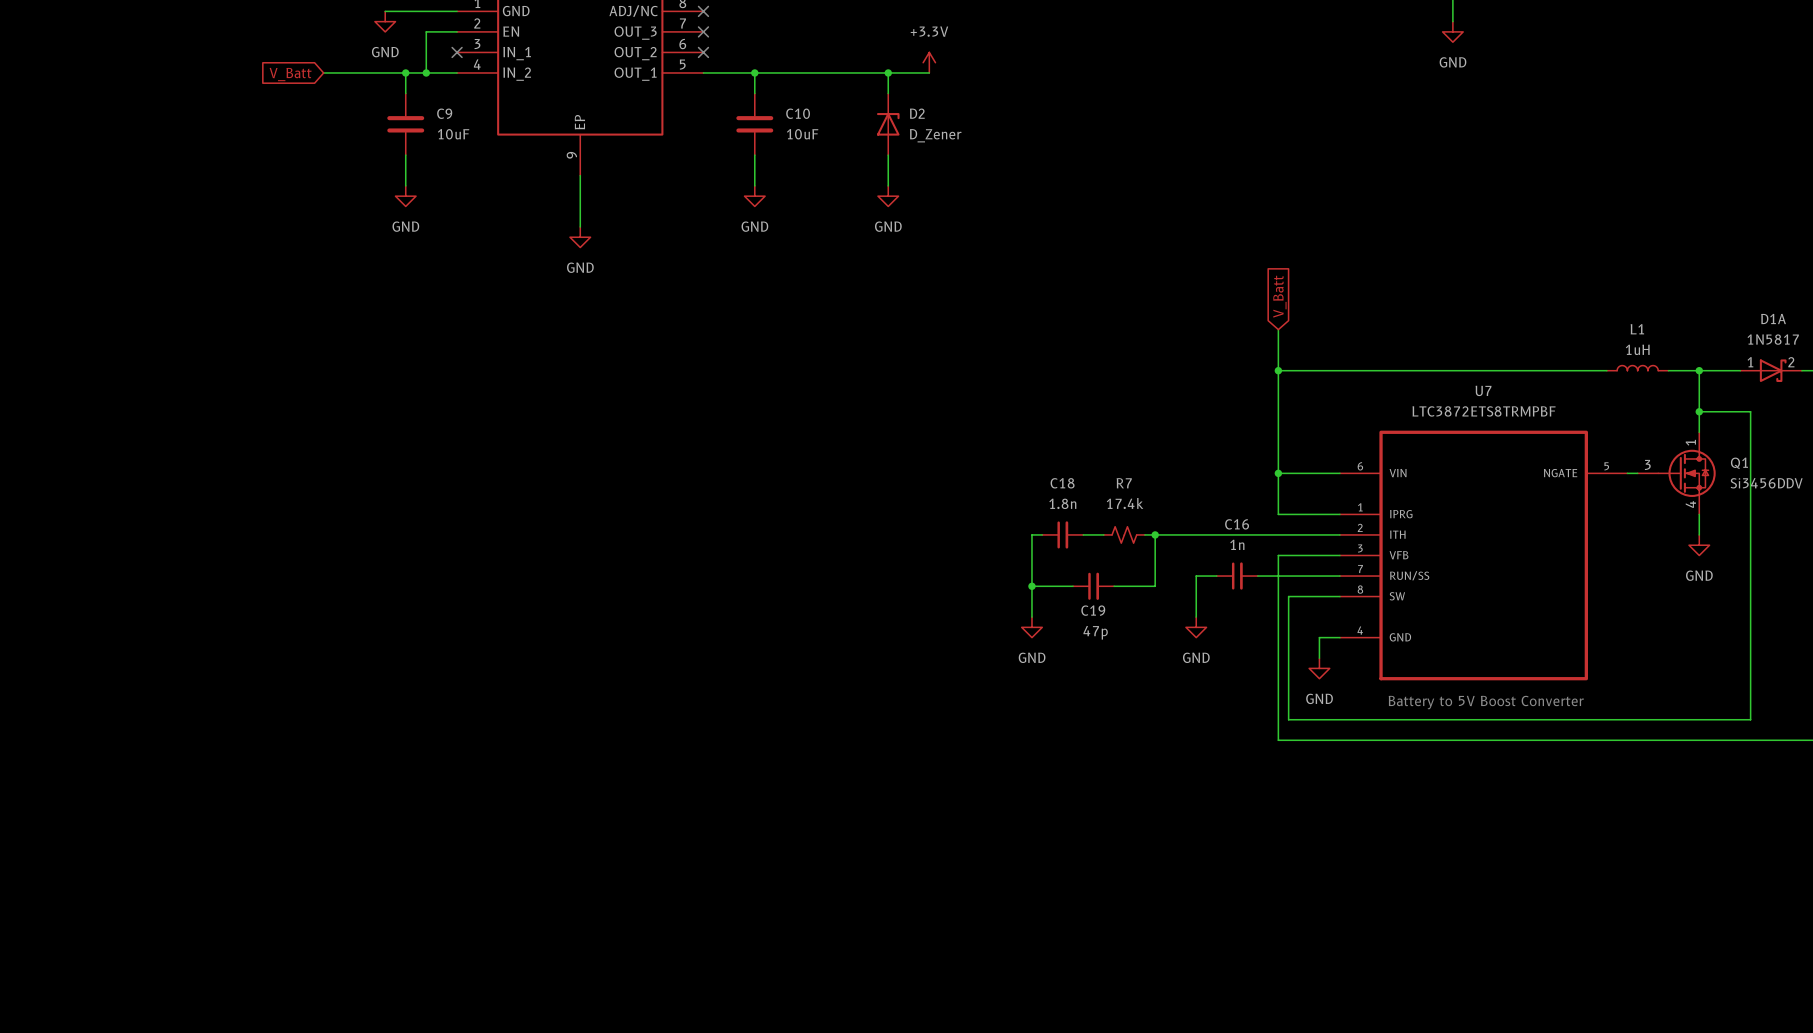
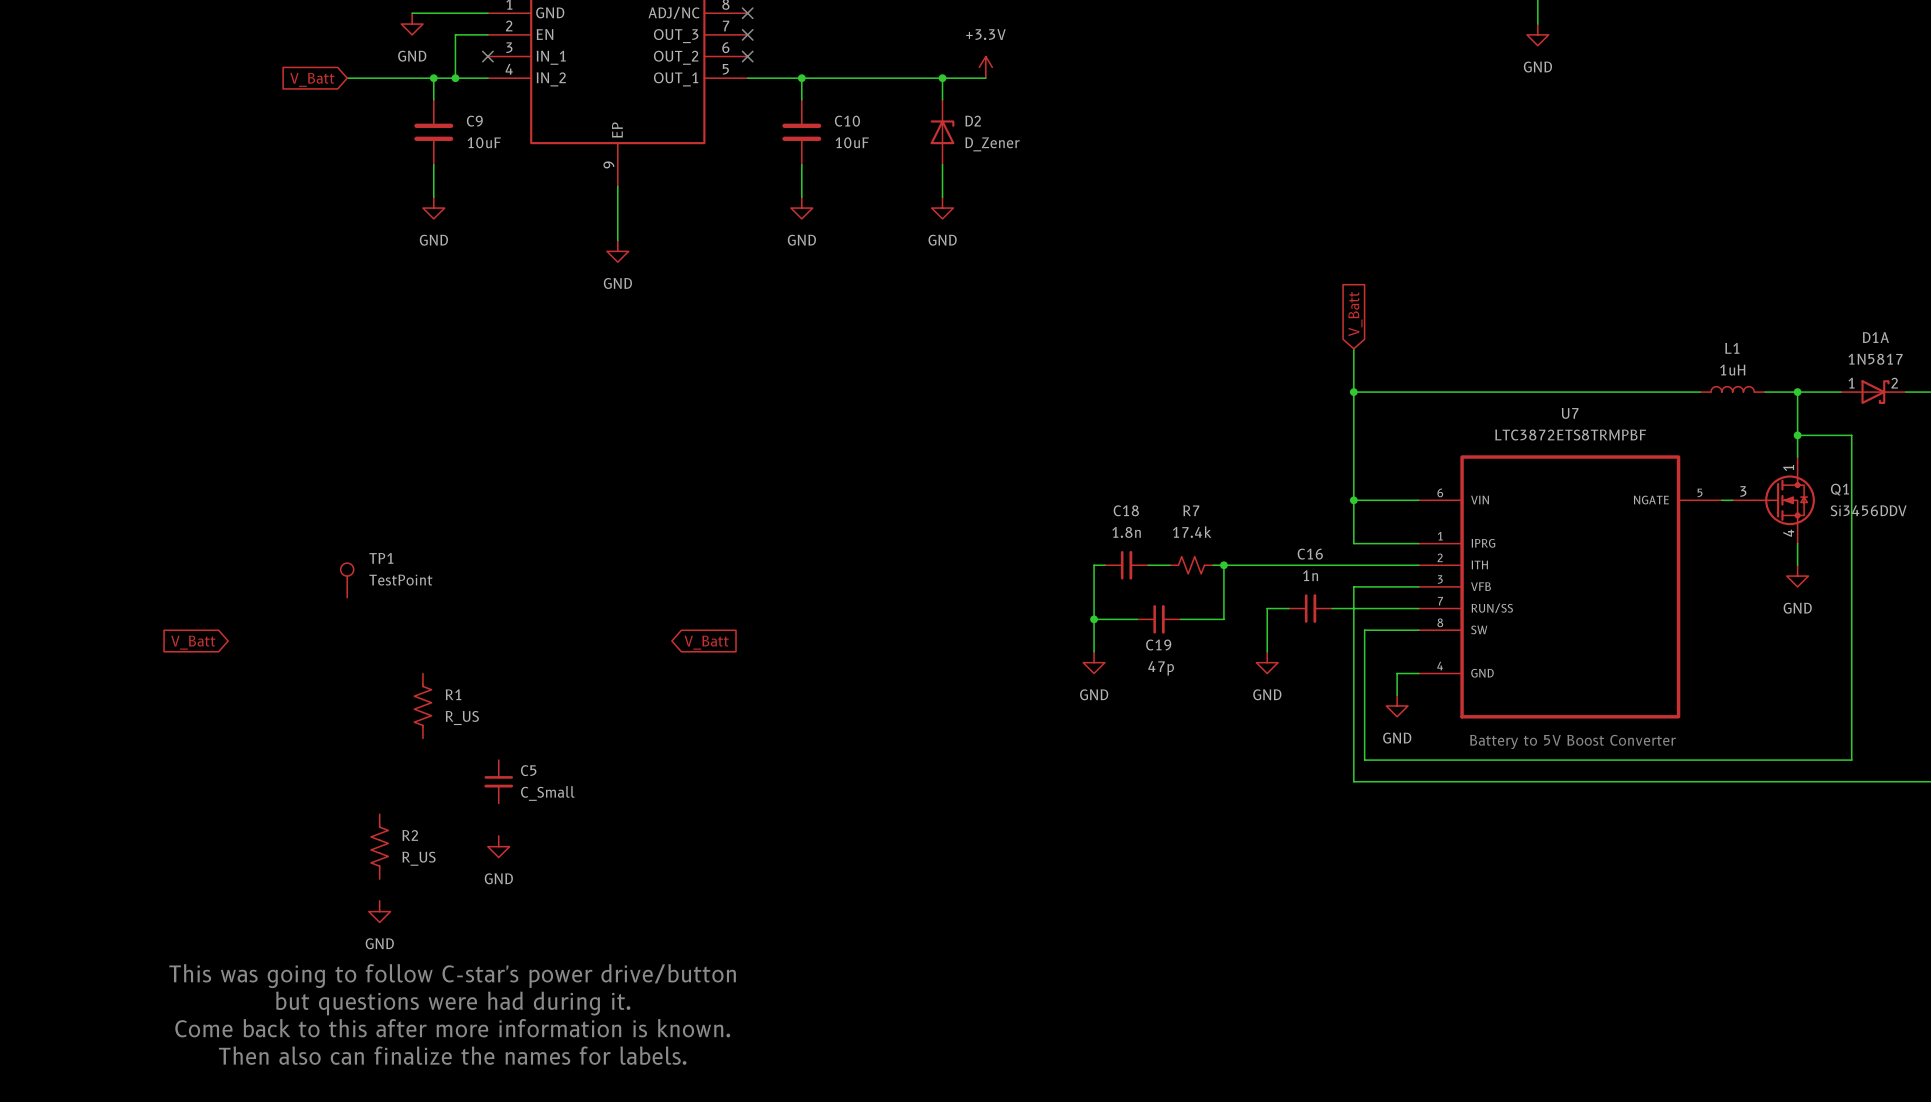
TP1: none -> TestPoint (347, 580)
global label: none -> V_Batt (193, 642)
global label: none -> V_Batt (706, 642)
R1: none -> R_US (422, 705)
C5: none -> C_Small (498, 781)
R2: none -> R_US (379, 846)
power symbol: none -> GND (498, 846)
power symbol: none -> GND (379, 911)
text: none -> This was going to follow C-star's power drive/button (452, 976)
text: none -> but questions were had during it. (453, 1003)
text: none -> Come back to this after more information is known. (452, 1028)
text: none -> Then also can finalize the names for labels. (452, 1055)

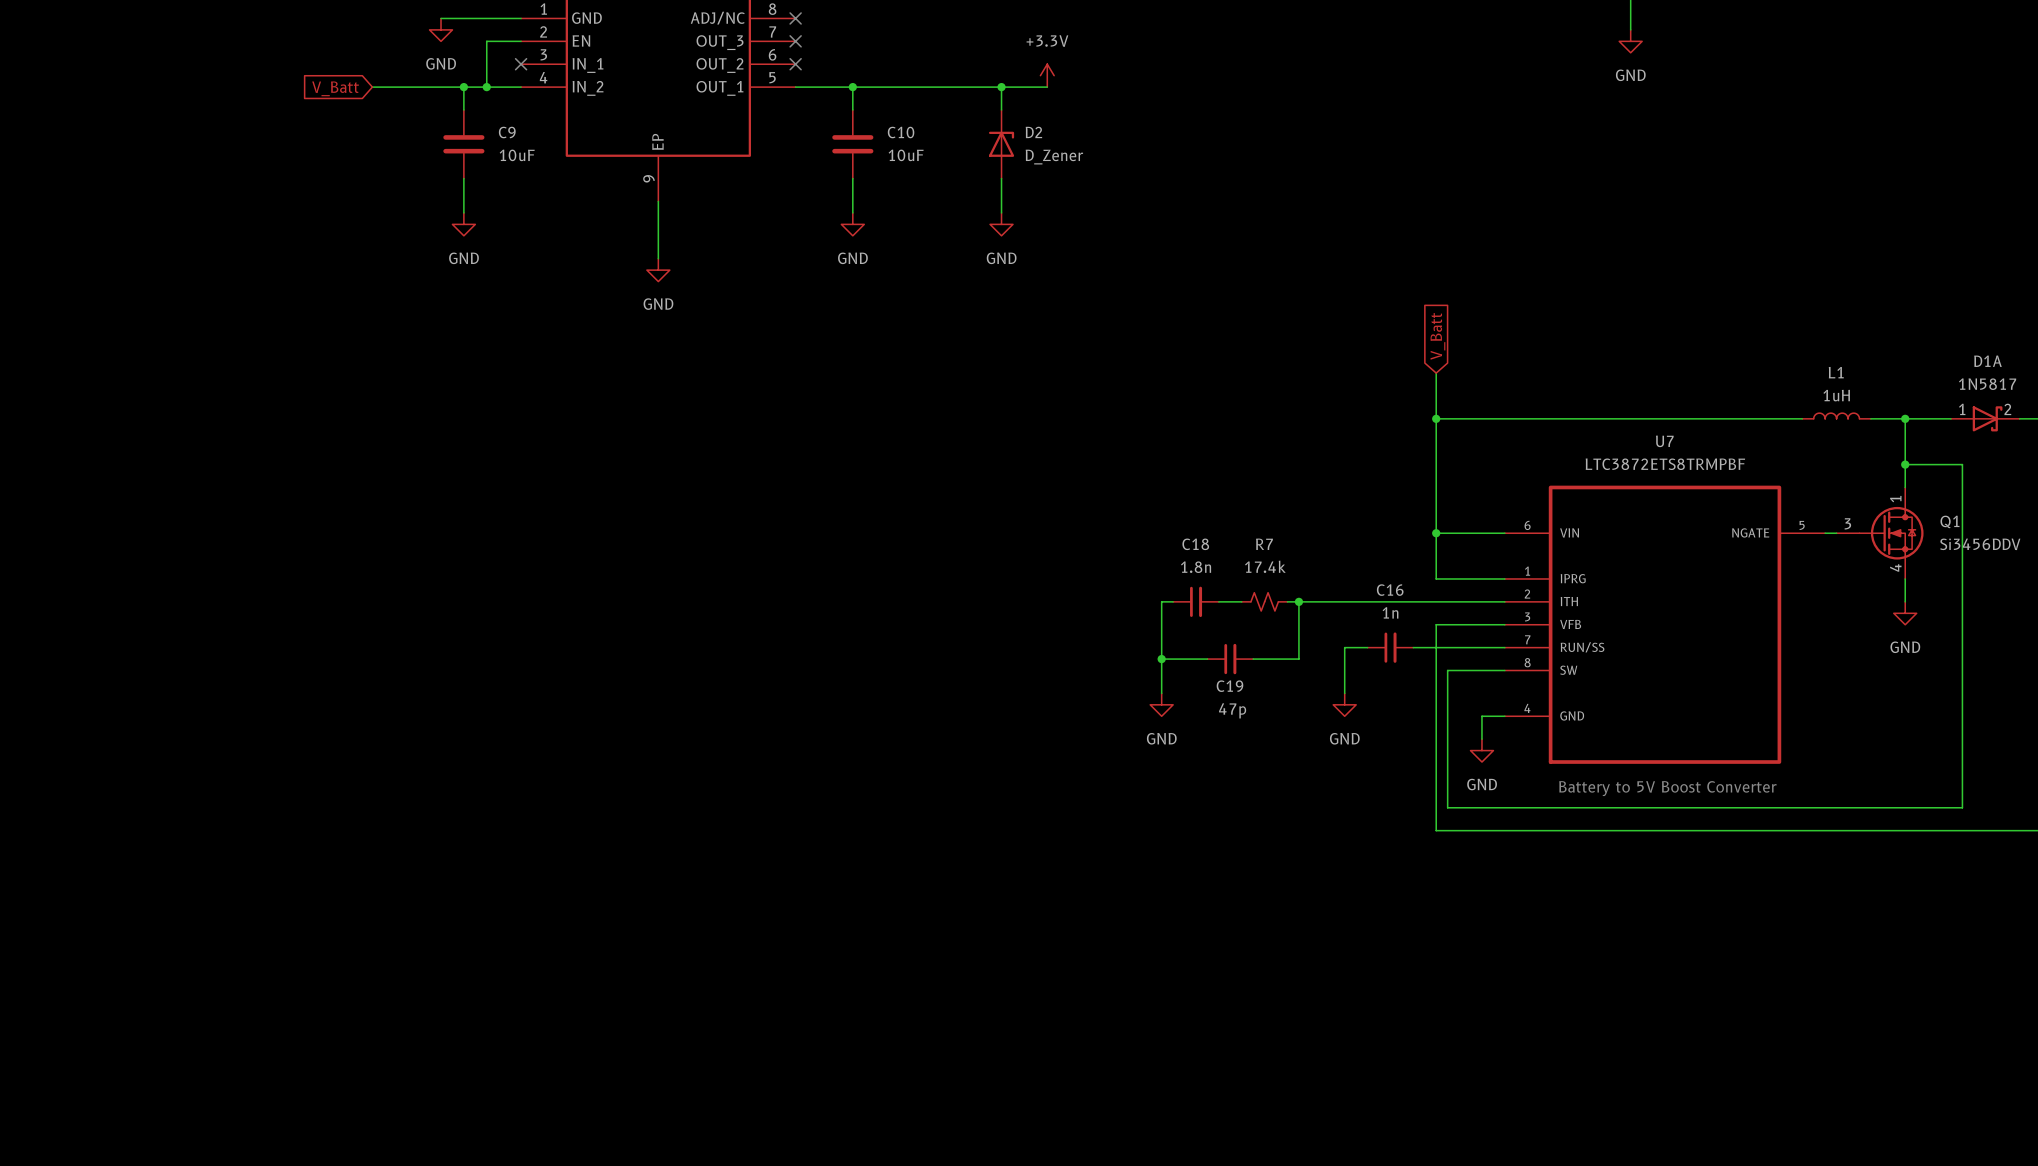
TP1: TestPoint (347, 580) -> none
global label: V_Batt (193, 642) -> none
global label: V_Batt (706, 642) -> none
R1: R_US (422, 705) -> none
C5: C_Small (498, 781) -> none
R2: R_US (379, 846) -> none
power symbol: GND (498, 846) -> none
power symbol: GND (379, 911) -> none
text: This was going to follow C-star's power drive/button (452, 976) -> none
text: but questions were had during it. (453, 1003) -> none
text: Come back to this after more information is known. (452, 1028) -> none
text: Then also can finalize the names for labels. (452, 1055) -> none

